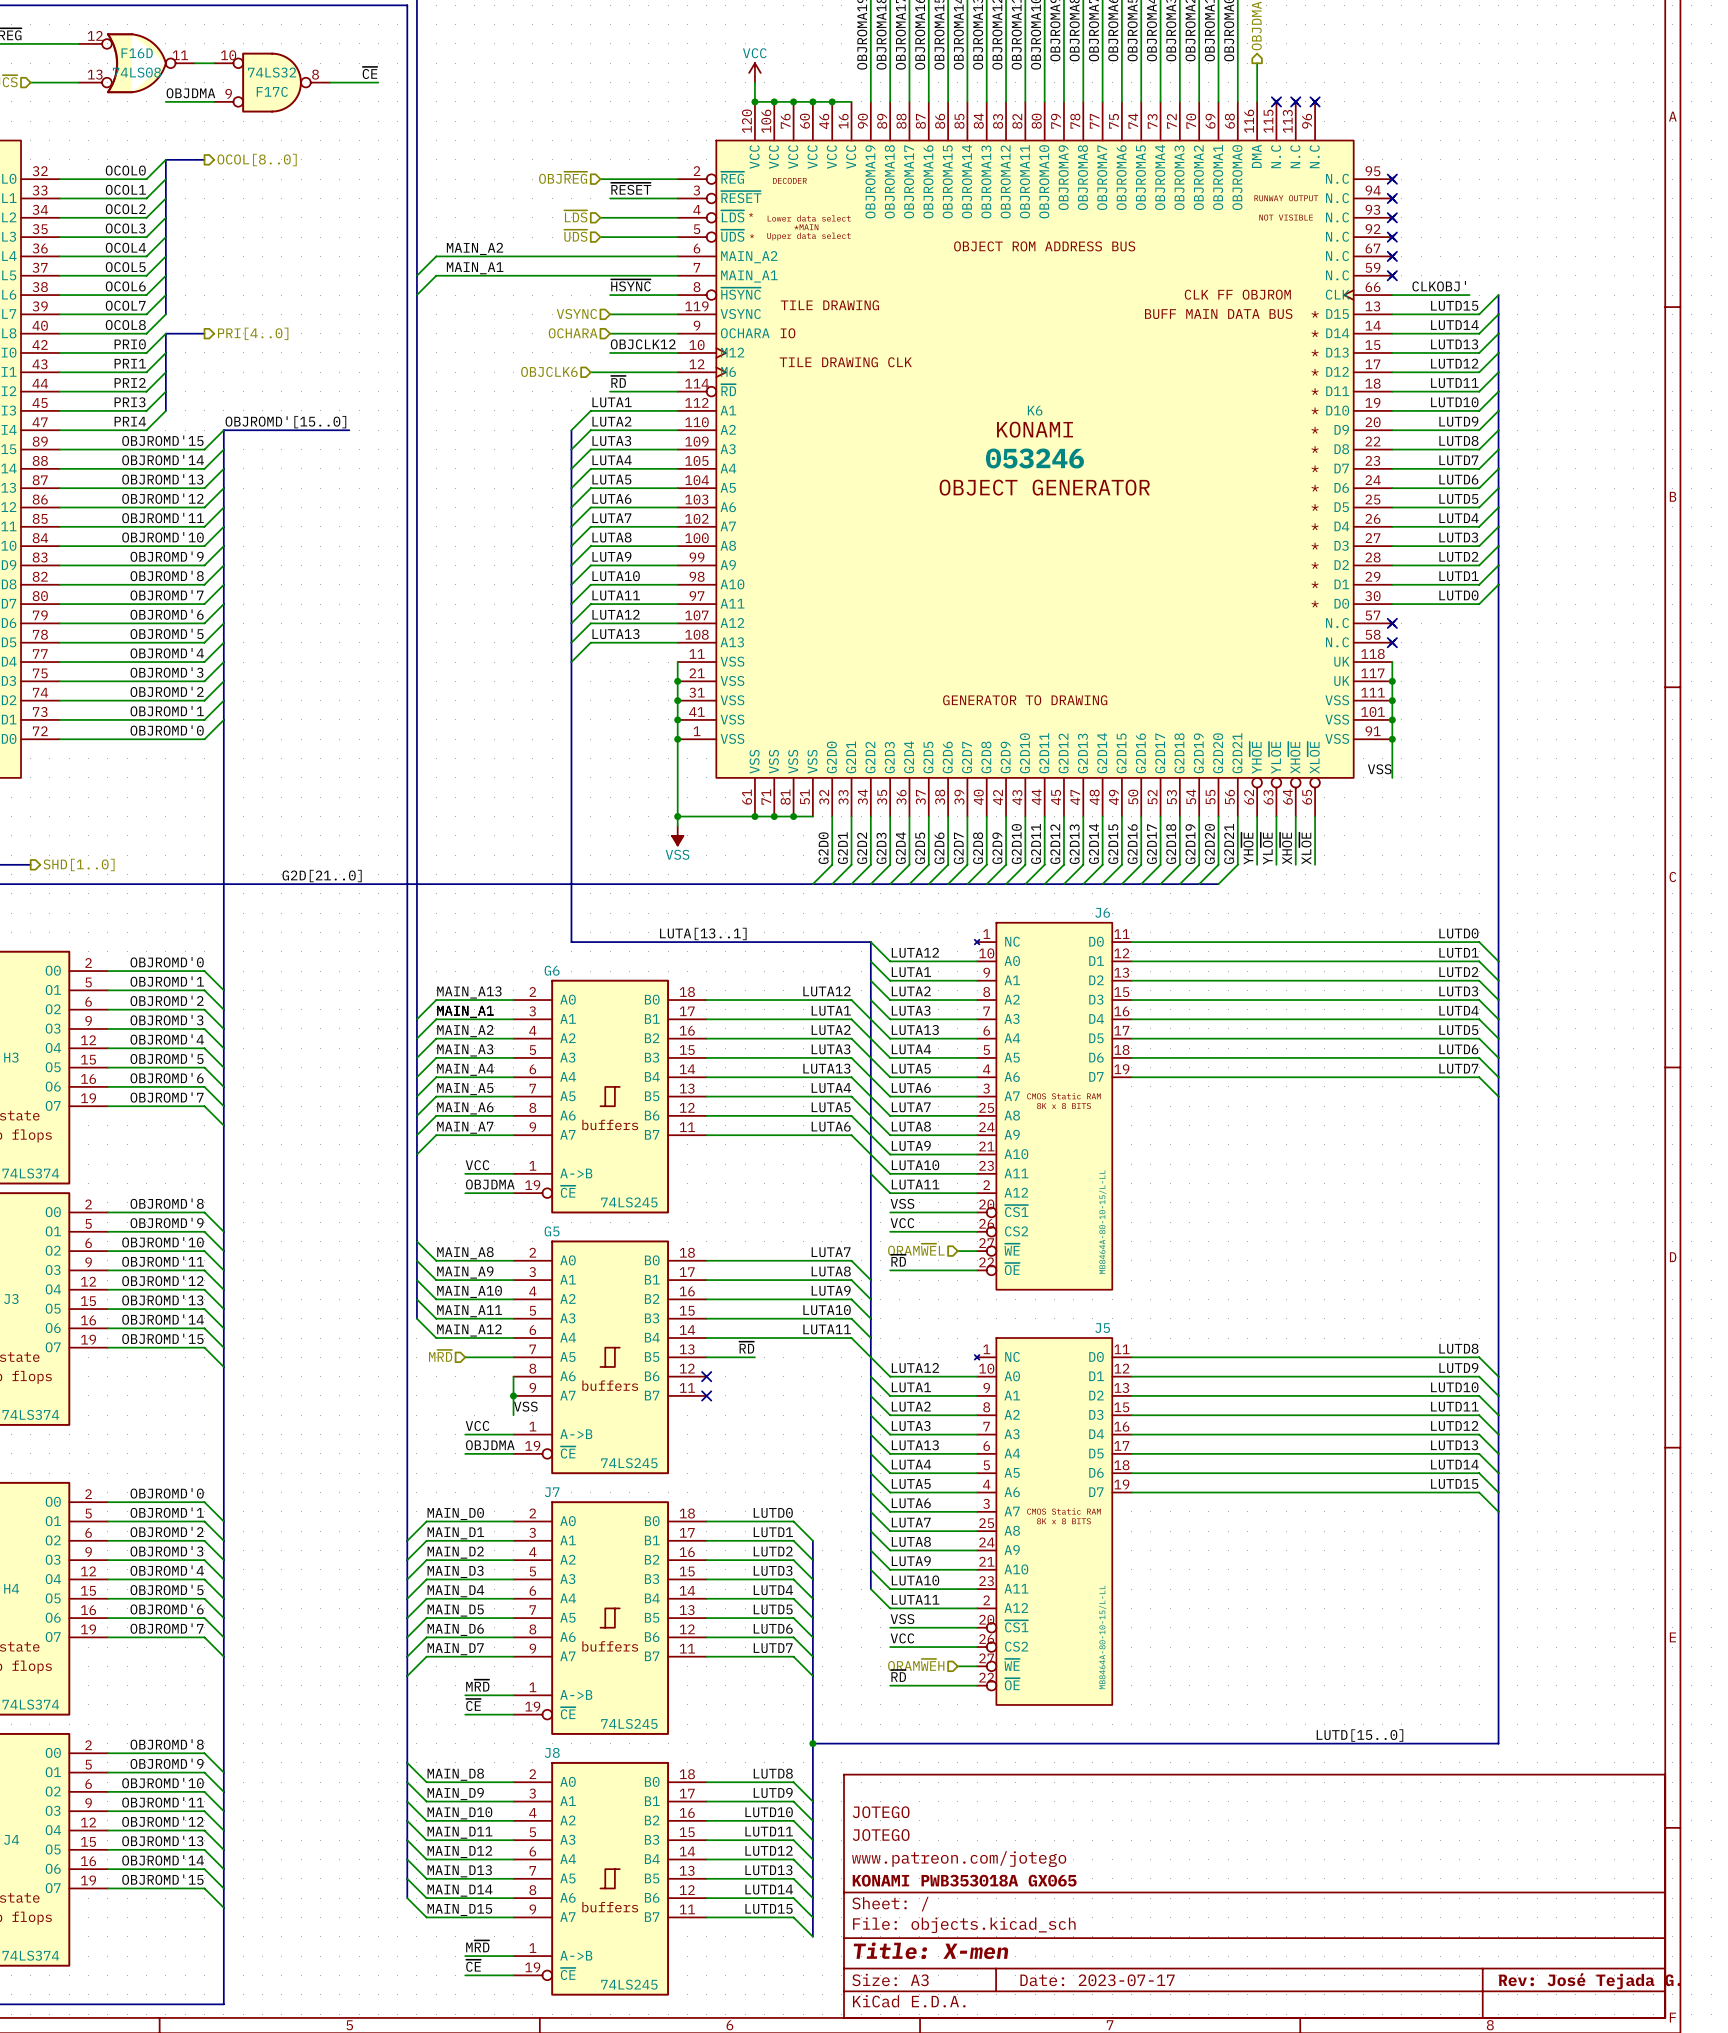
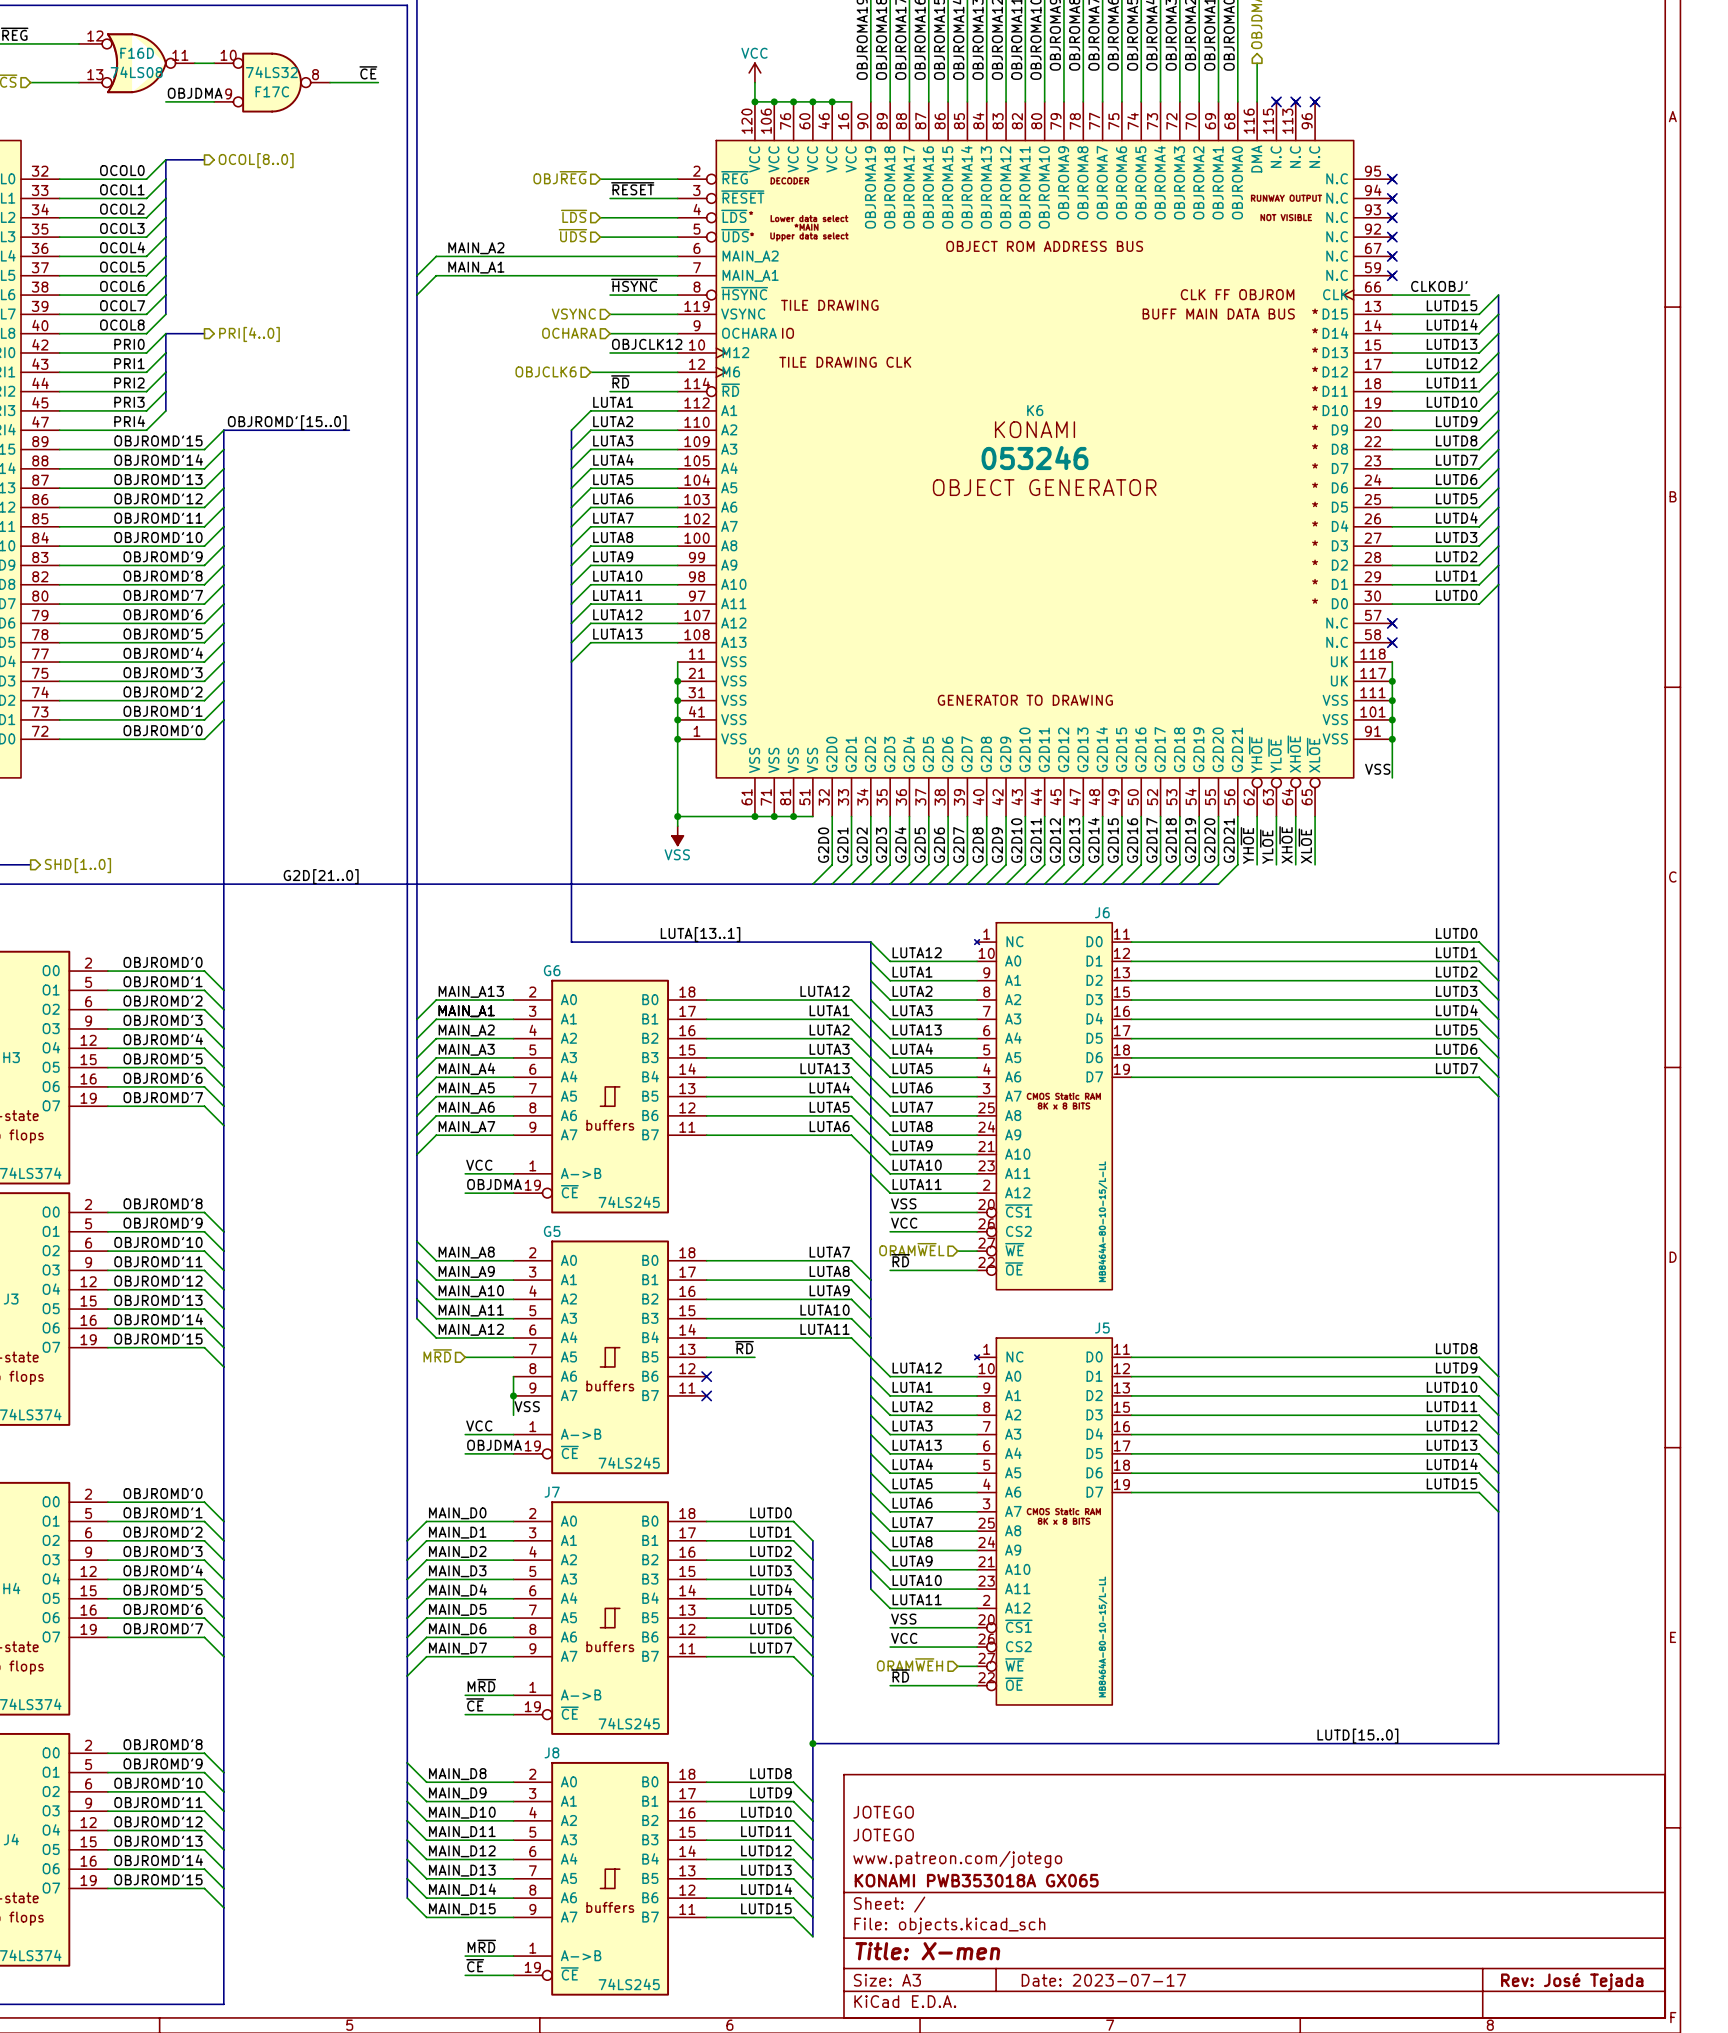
title block: Rev: José Tejada G. (1590, 1981) -> Rev: José Tejada (1572, 1981)

